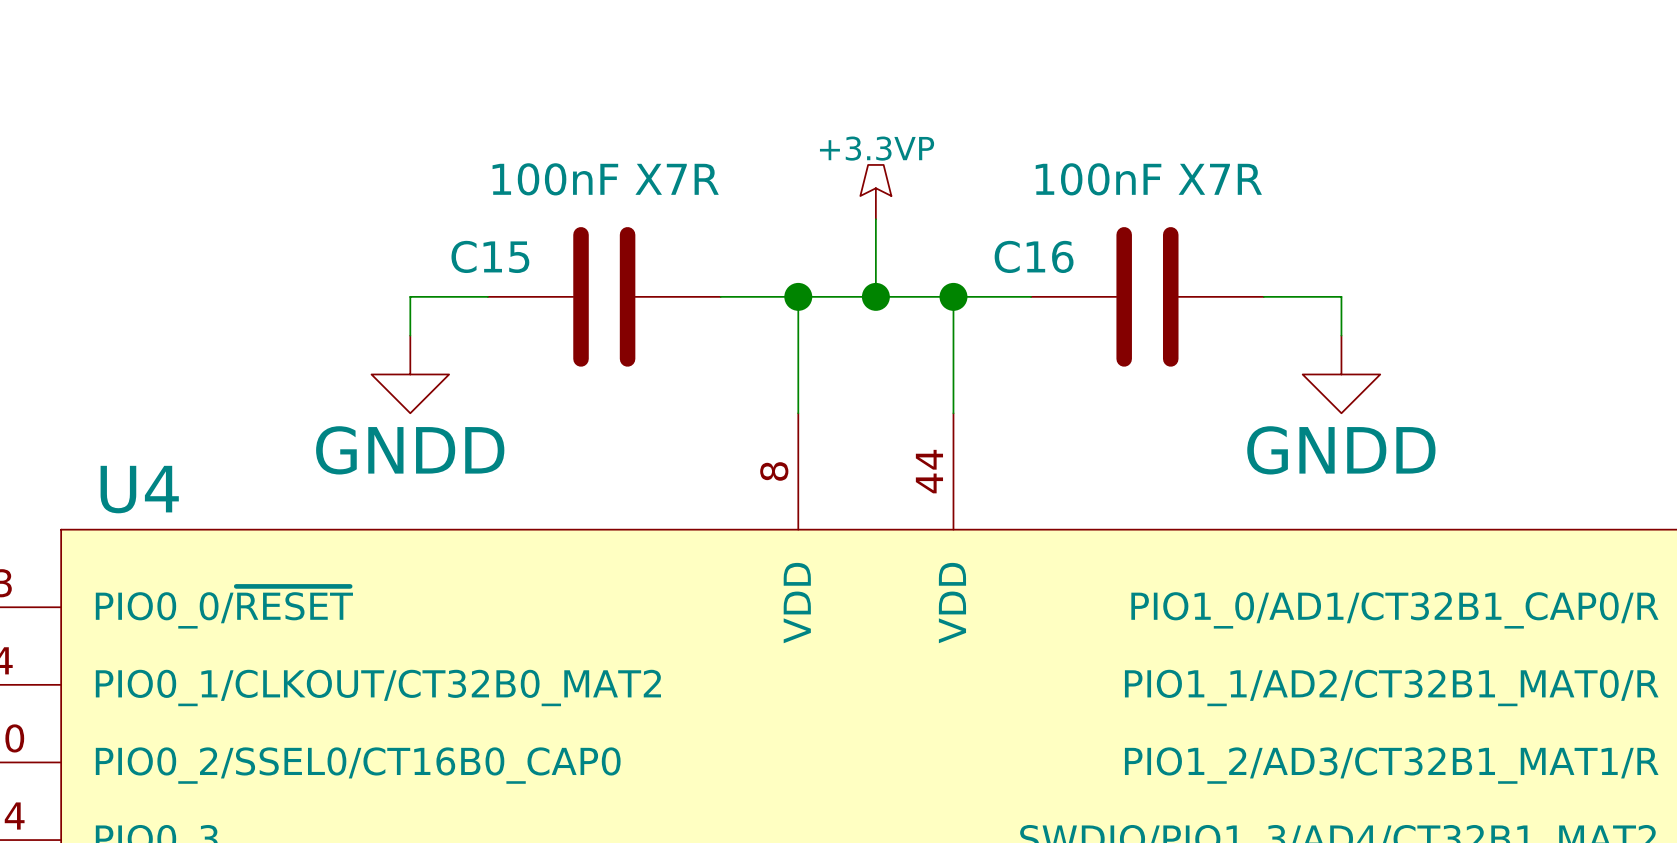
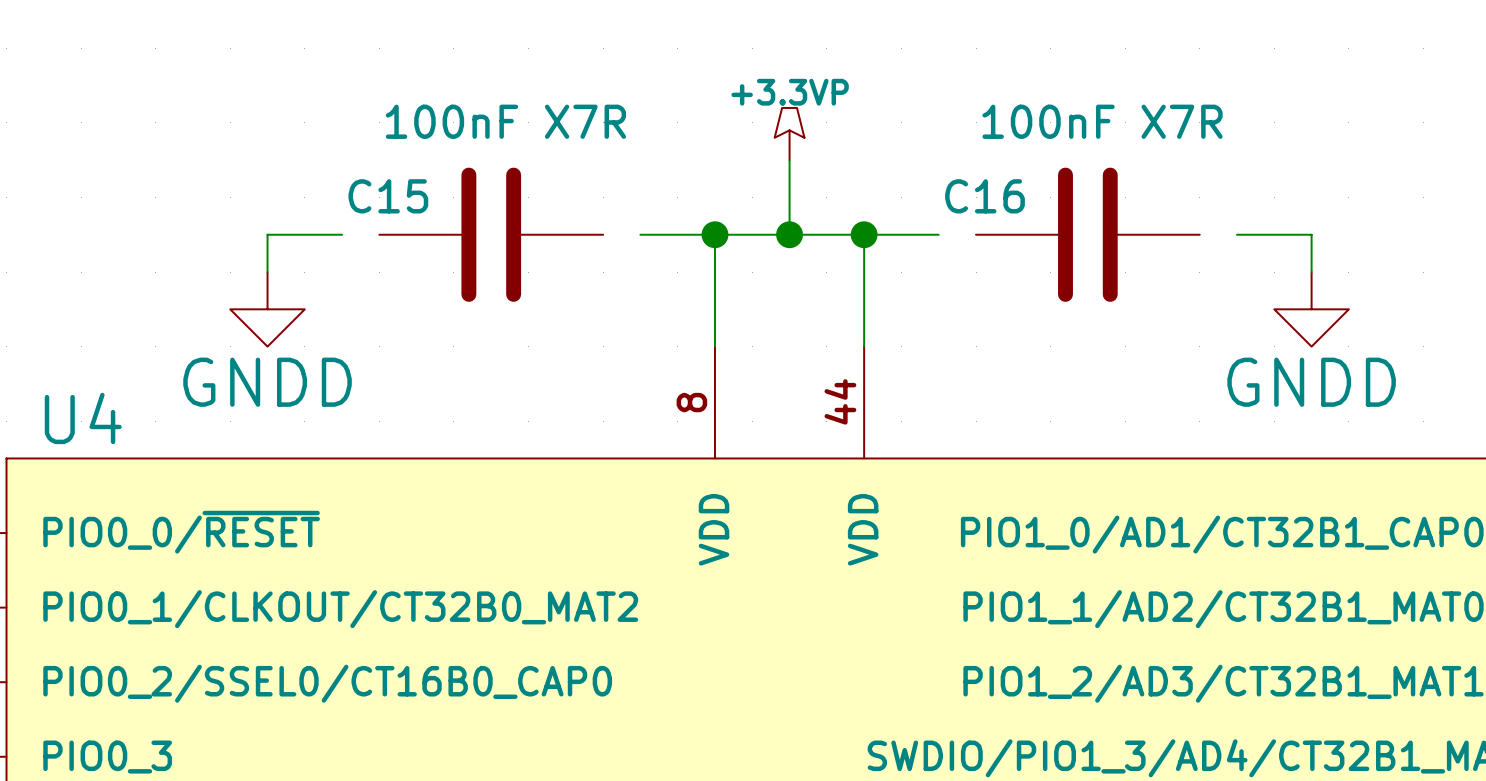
wire: (487, 296) (410, 296) (410, 335) -> (342, 234) (267, 234) (267, 272)
C15 position: (604, 296) -> (491, 234)
C16 position: (1147, 296) -> (1087, 234)
wire: (1263, 296) (1341, 296) (1341, 335) -> (1237, 234) (1311, 234) (1311, 272)
power symbol position: GNDD (410, 374) -> GNDD (267, 309)
power symbol position: GNDD (1341, 374) -> GNDD (1311, 309)

